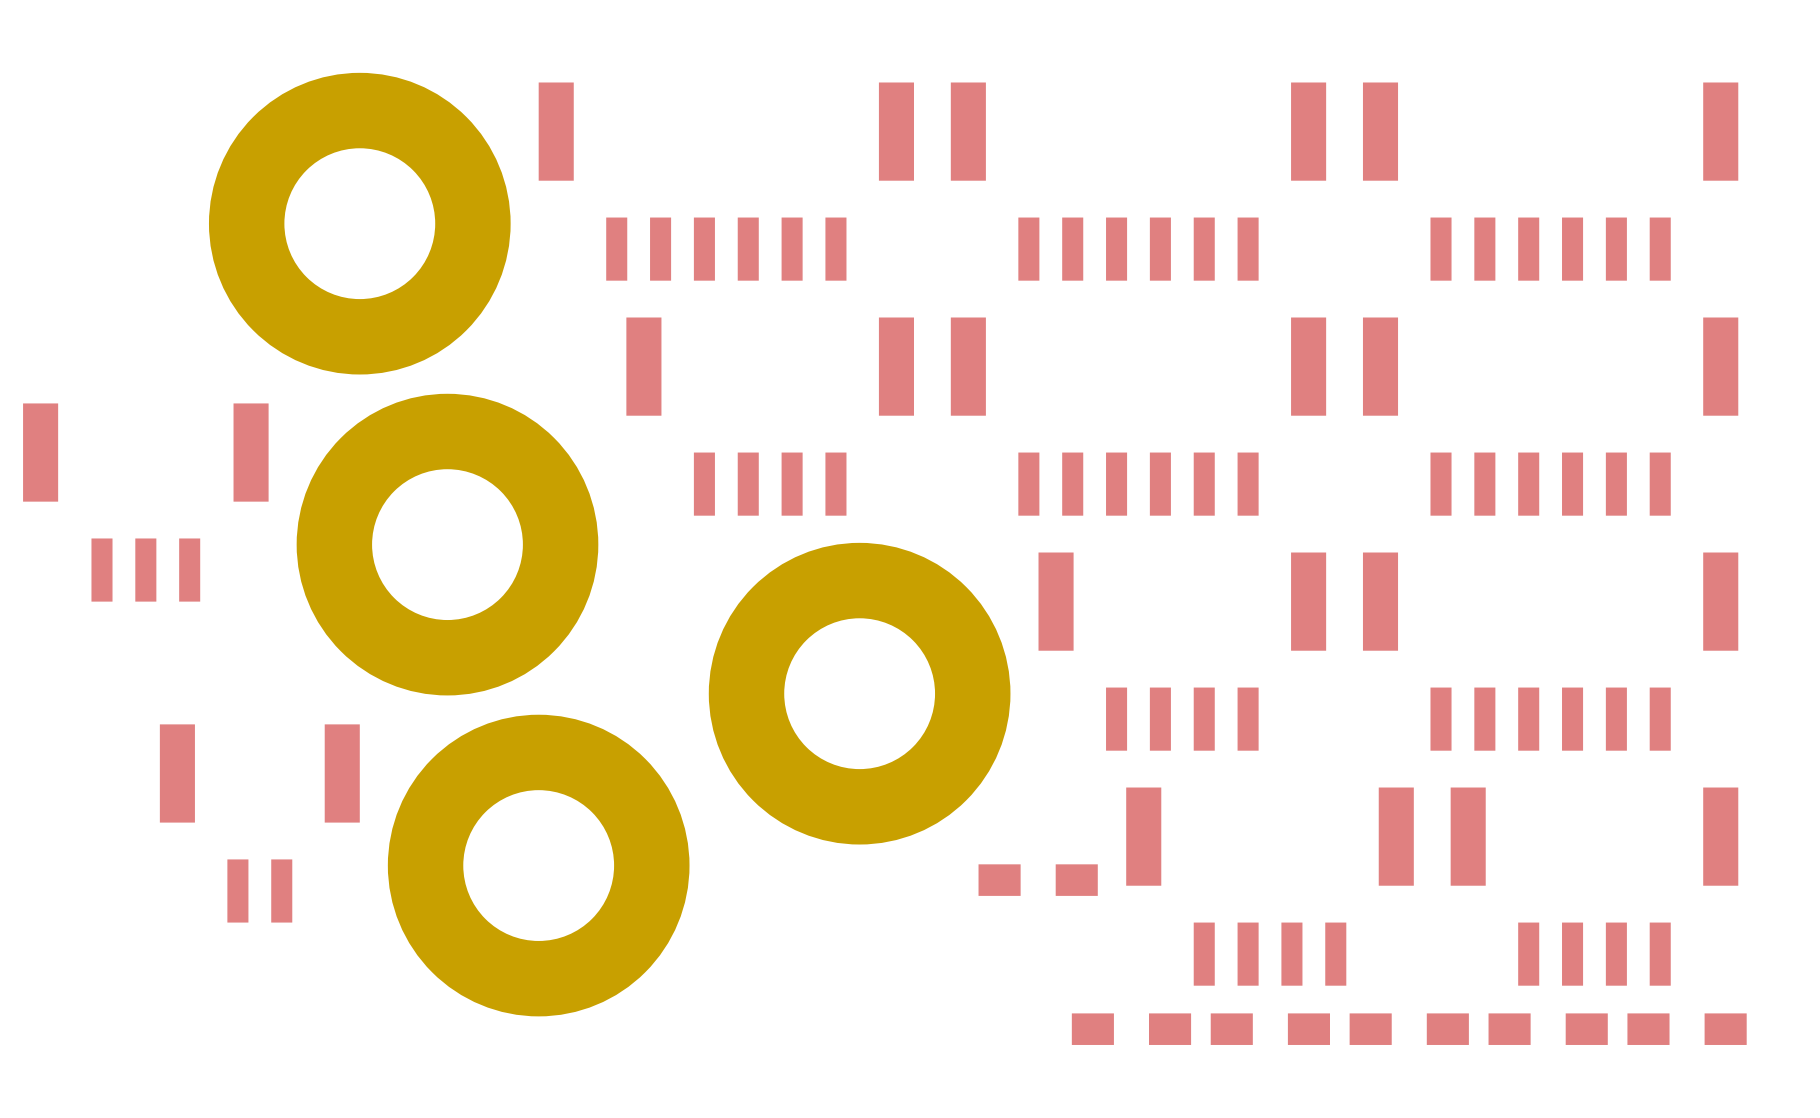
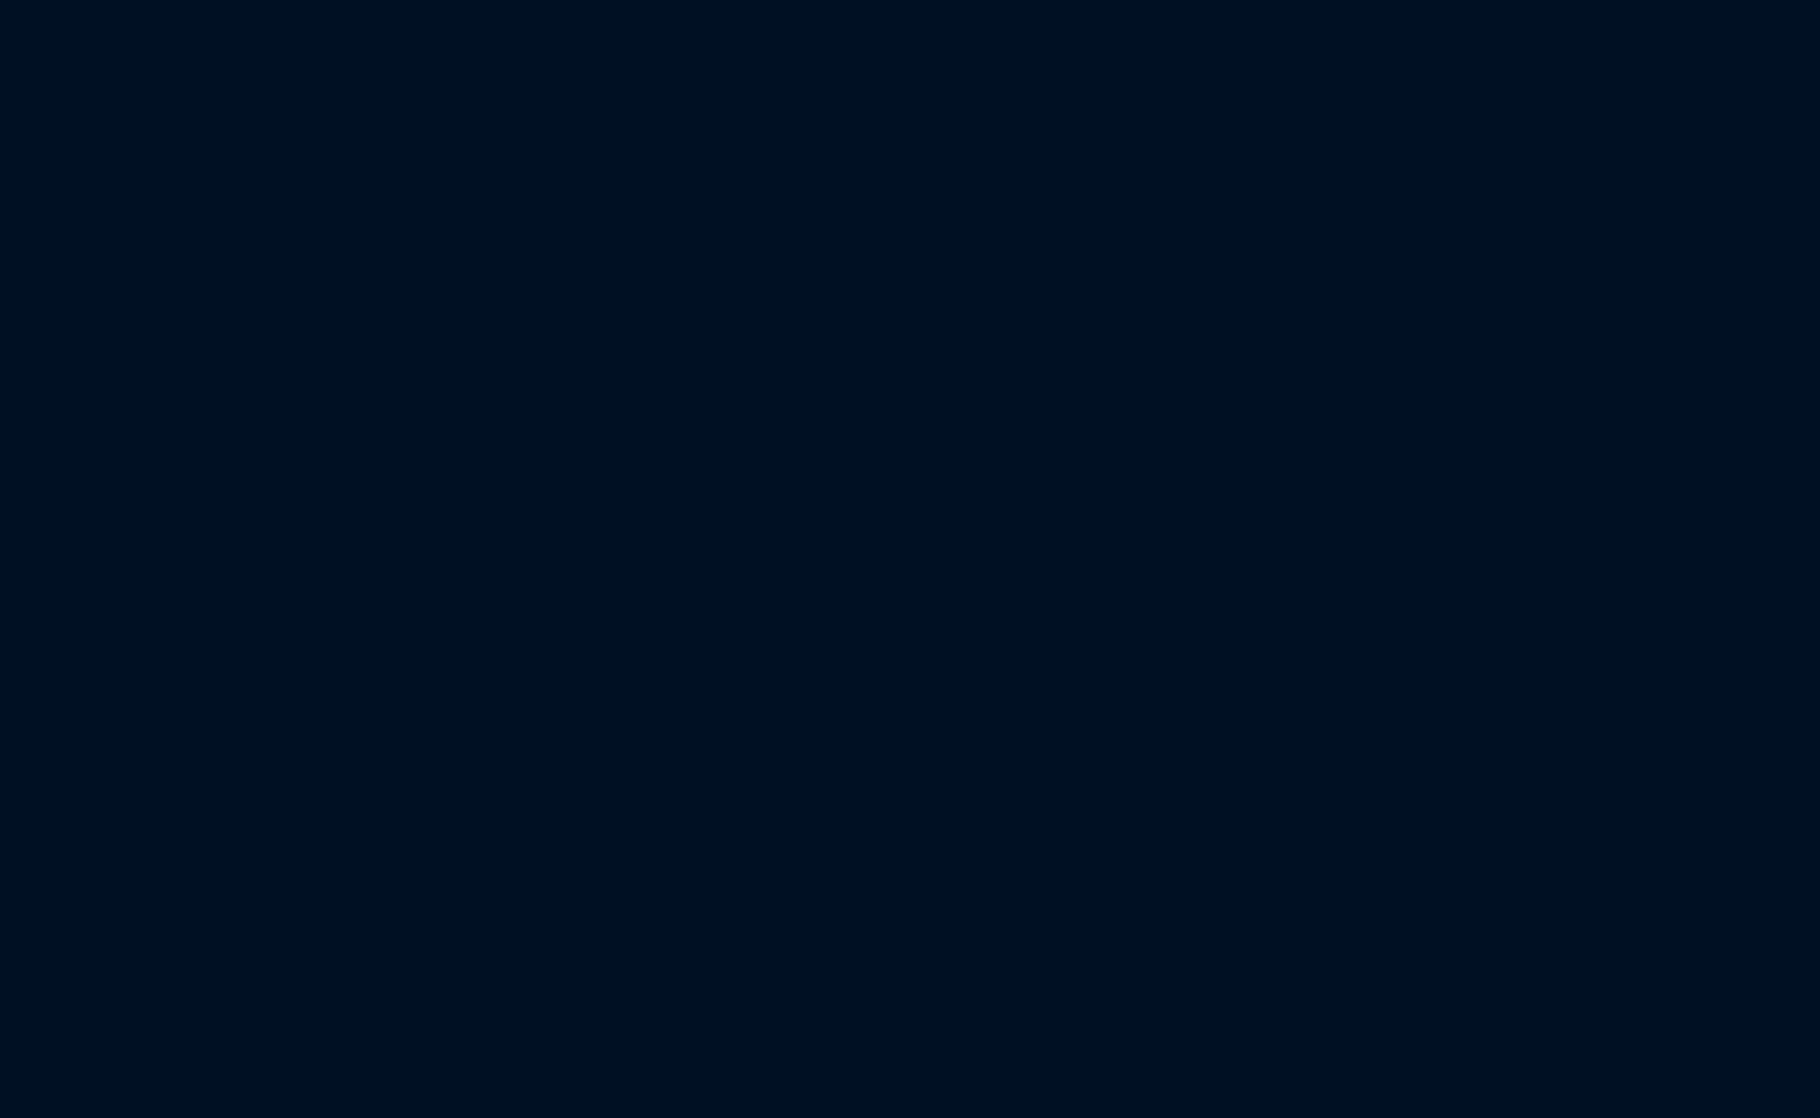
part: (726, 181) -> none
part: (1138, 181) -> none
part: (1550, 181) -> none
part: (359, 223) -> none
part: (770, 416) -> none
part: (1138, 416) -> none
part: (1550, 416) -> none
part: (145, 502) -> none
part: (447, 544) -> none
part: (1182, 651) -> none
part: (1550, 651) -> none
part: (859, 693) -> none
part: (259, 823) -> none
part: (538, 865) -> none
part: (1038, 880) -> none
part: (1270, 886) -> none
part: (1594, 886) -> none
part: (1131, 1029) -> none
part: (1270, 1029) -> none
part: (1409, 1029) -> none
part: (1548, 1029) -> none
part: (1687, 1029) -> none

